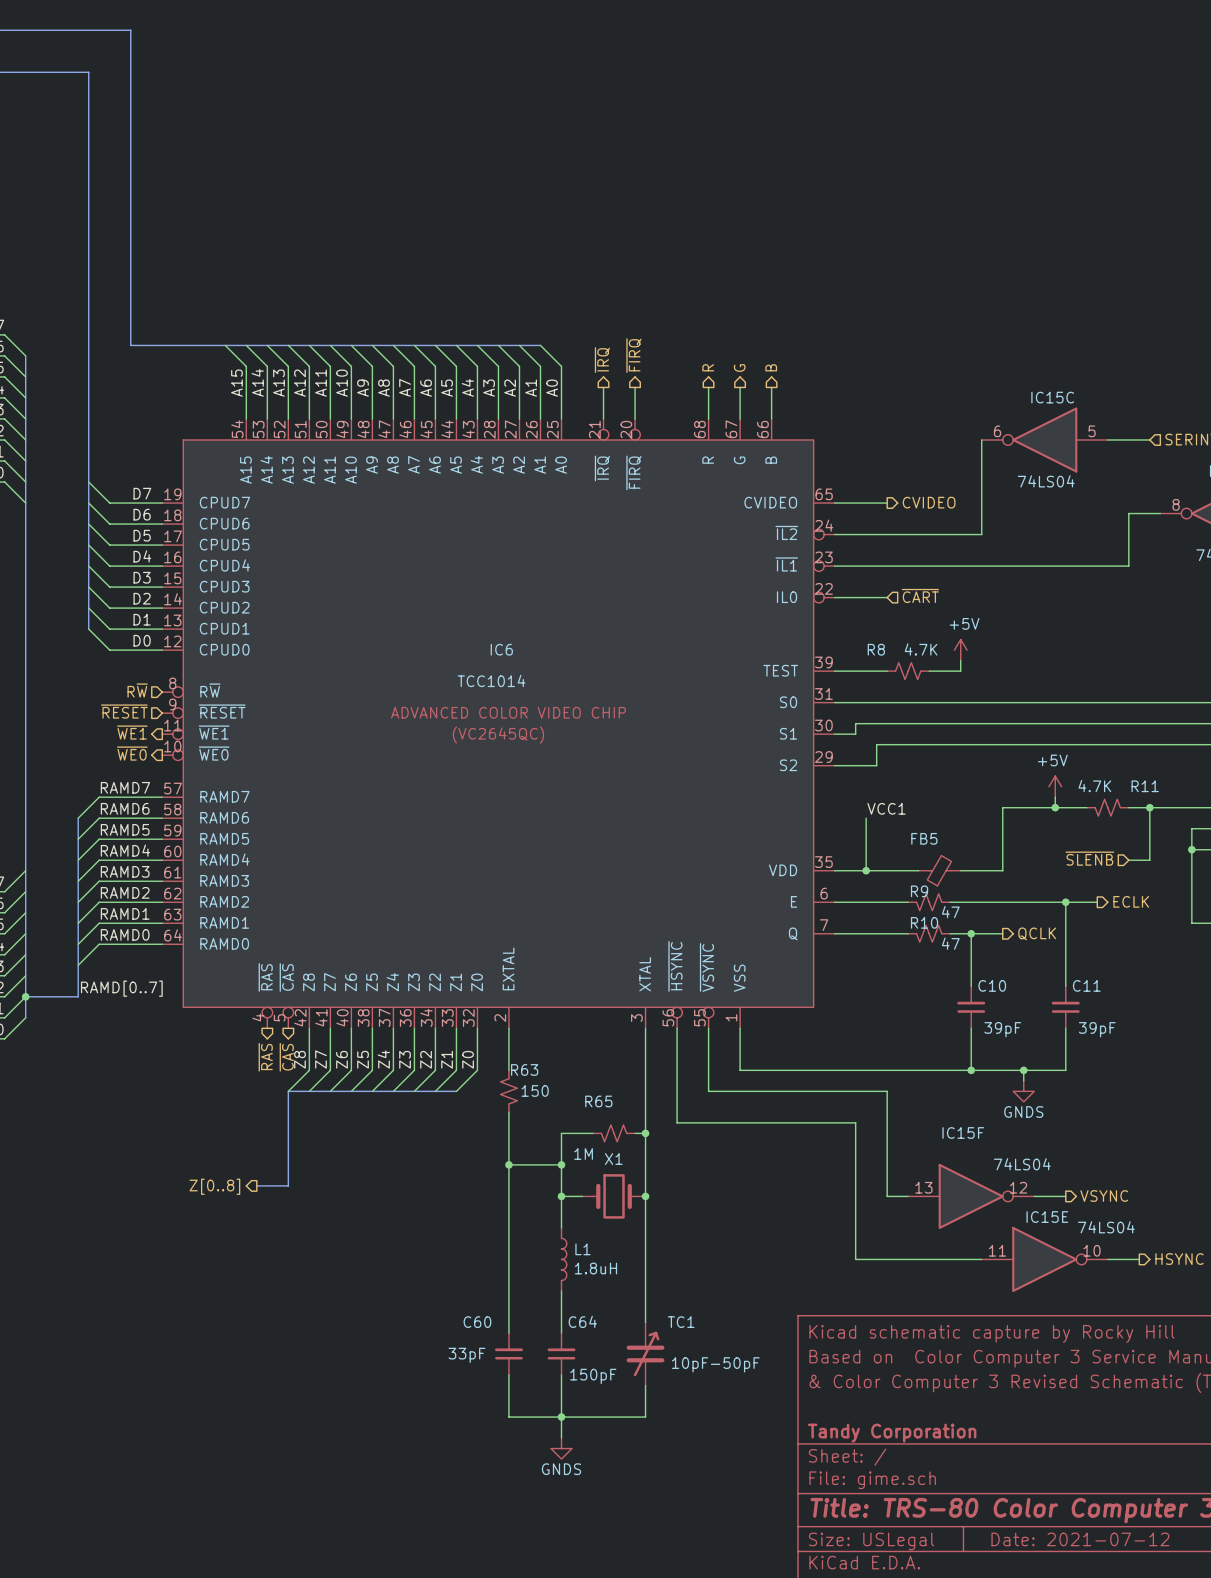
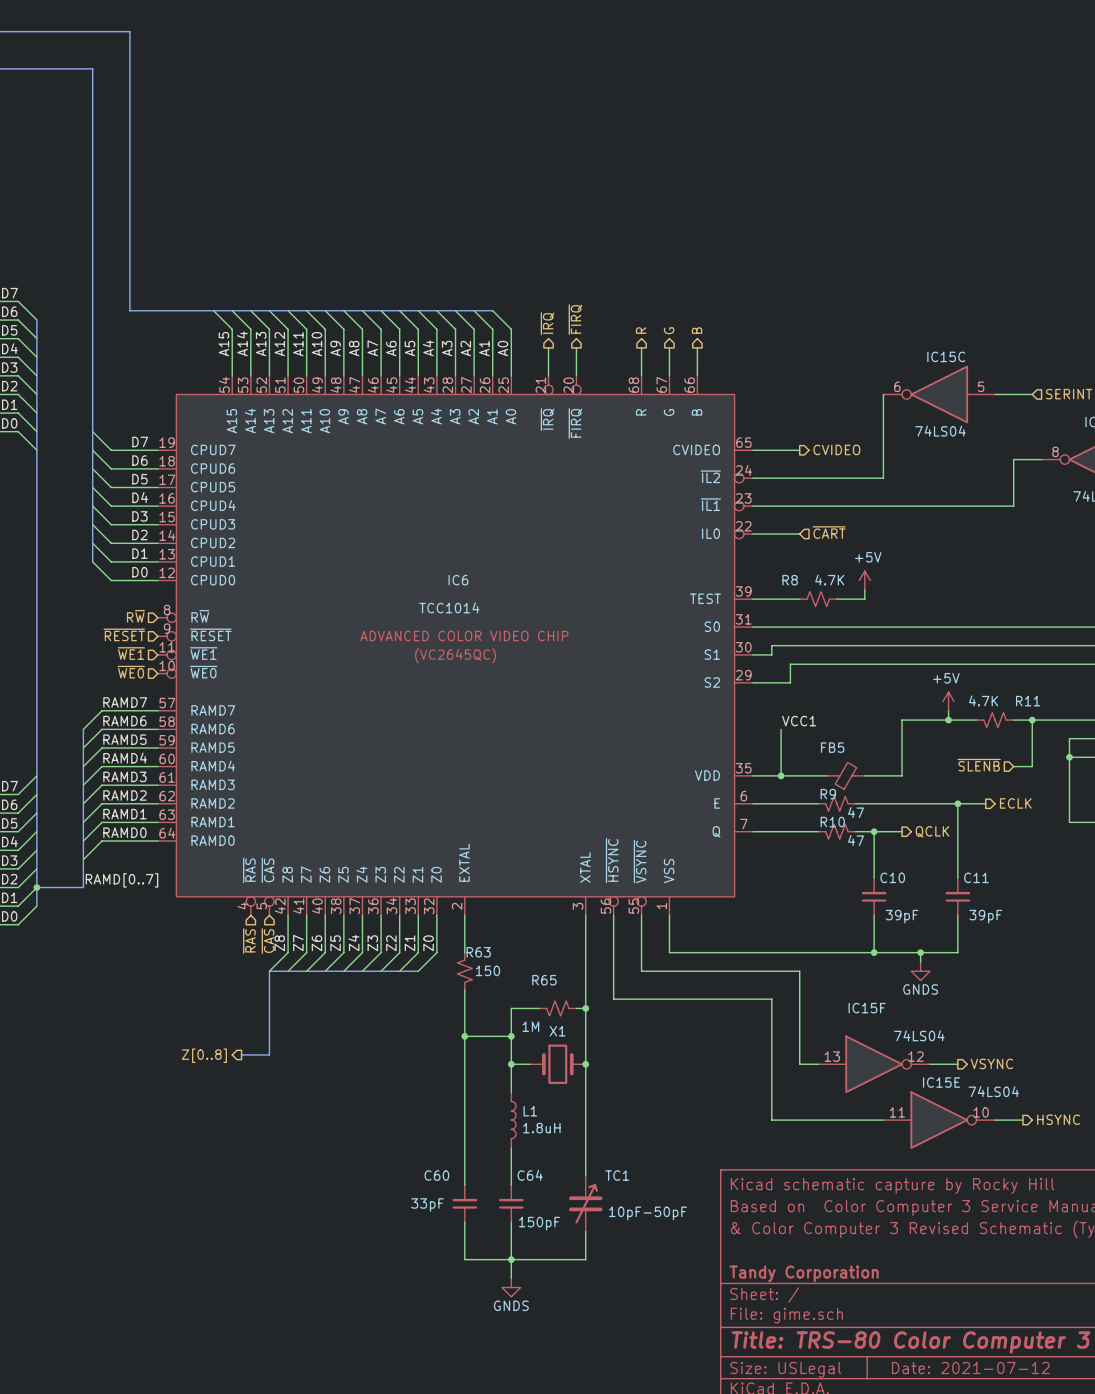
hierarchical label shape: output (132, 732) -> input (131, 653)
hierarchical label shape: output (132, 753) -> input (131, 672)
hierarchical label shape: output (265, 1057) -> input (249, 941)
hierarchical label shape: output (286, 1057) -> input (268, 941)

